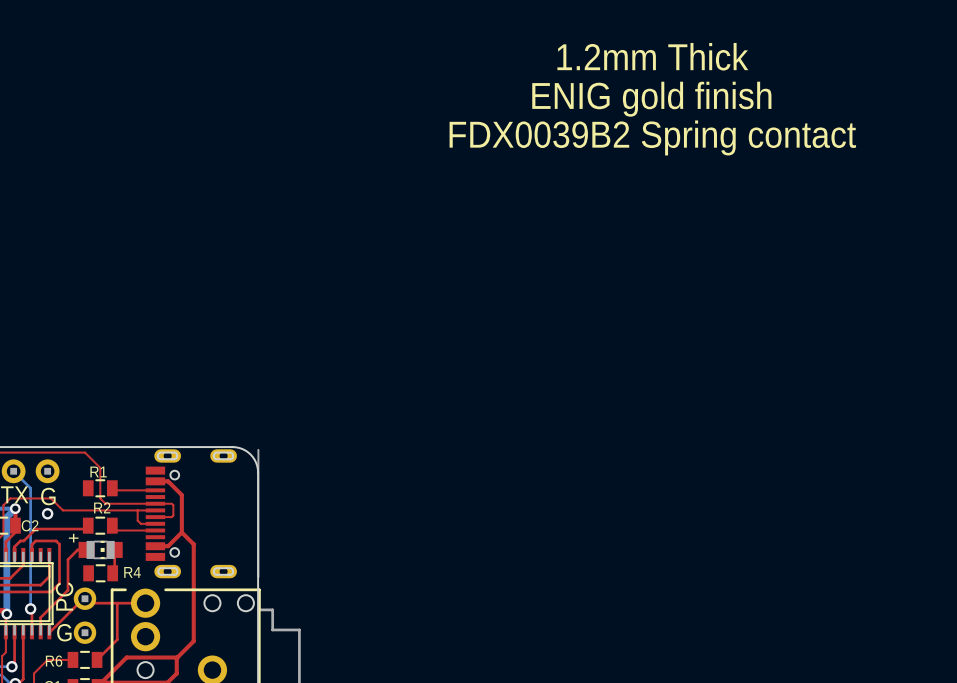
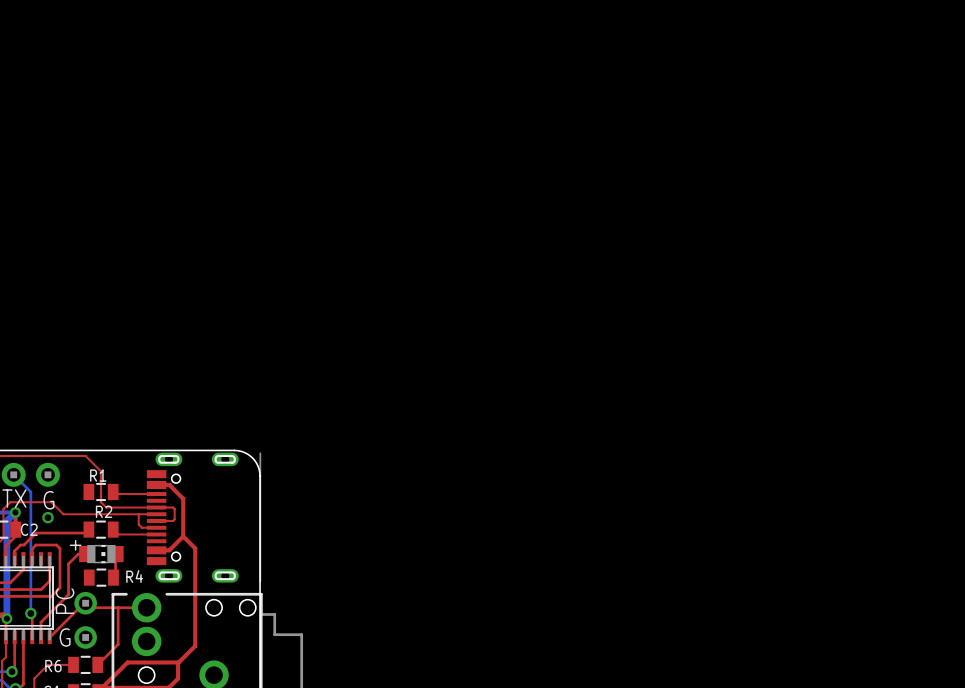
text: 1.2mm Thick (652, 56) -> none
text: ENIG gold finish (651, 99) -> none
text: FDX0039B2 Spring contact (652, 137) -> none

